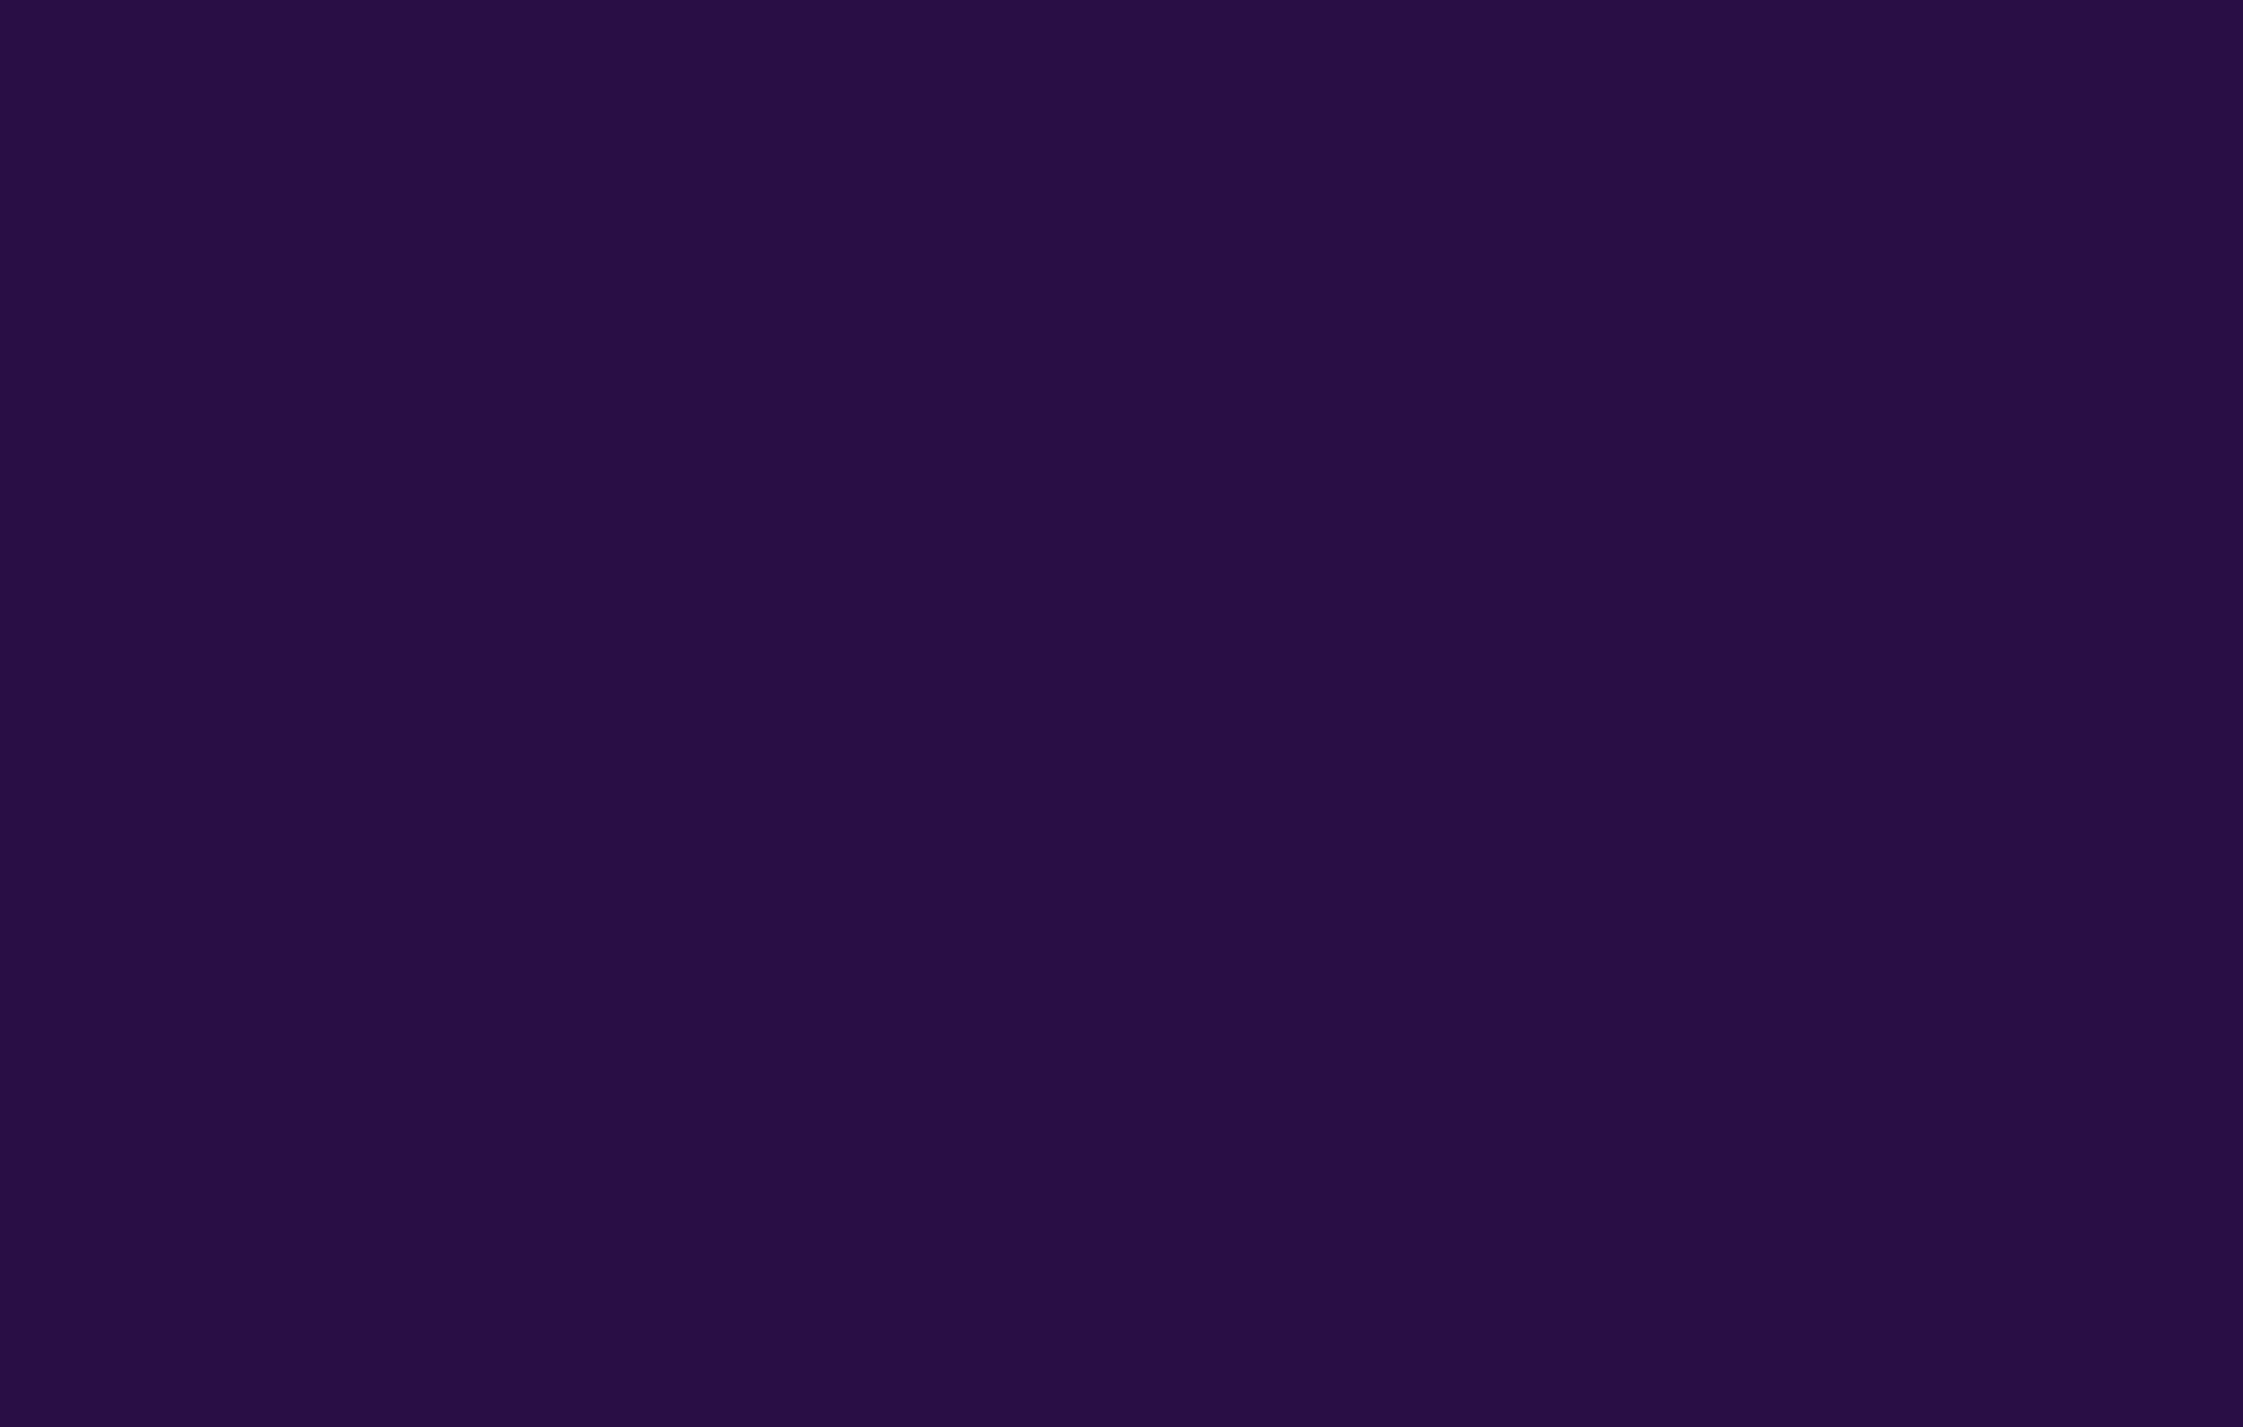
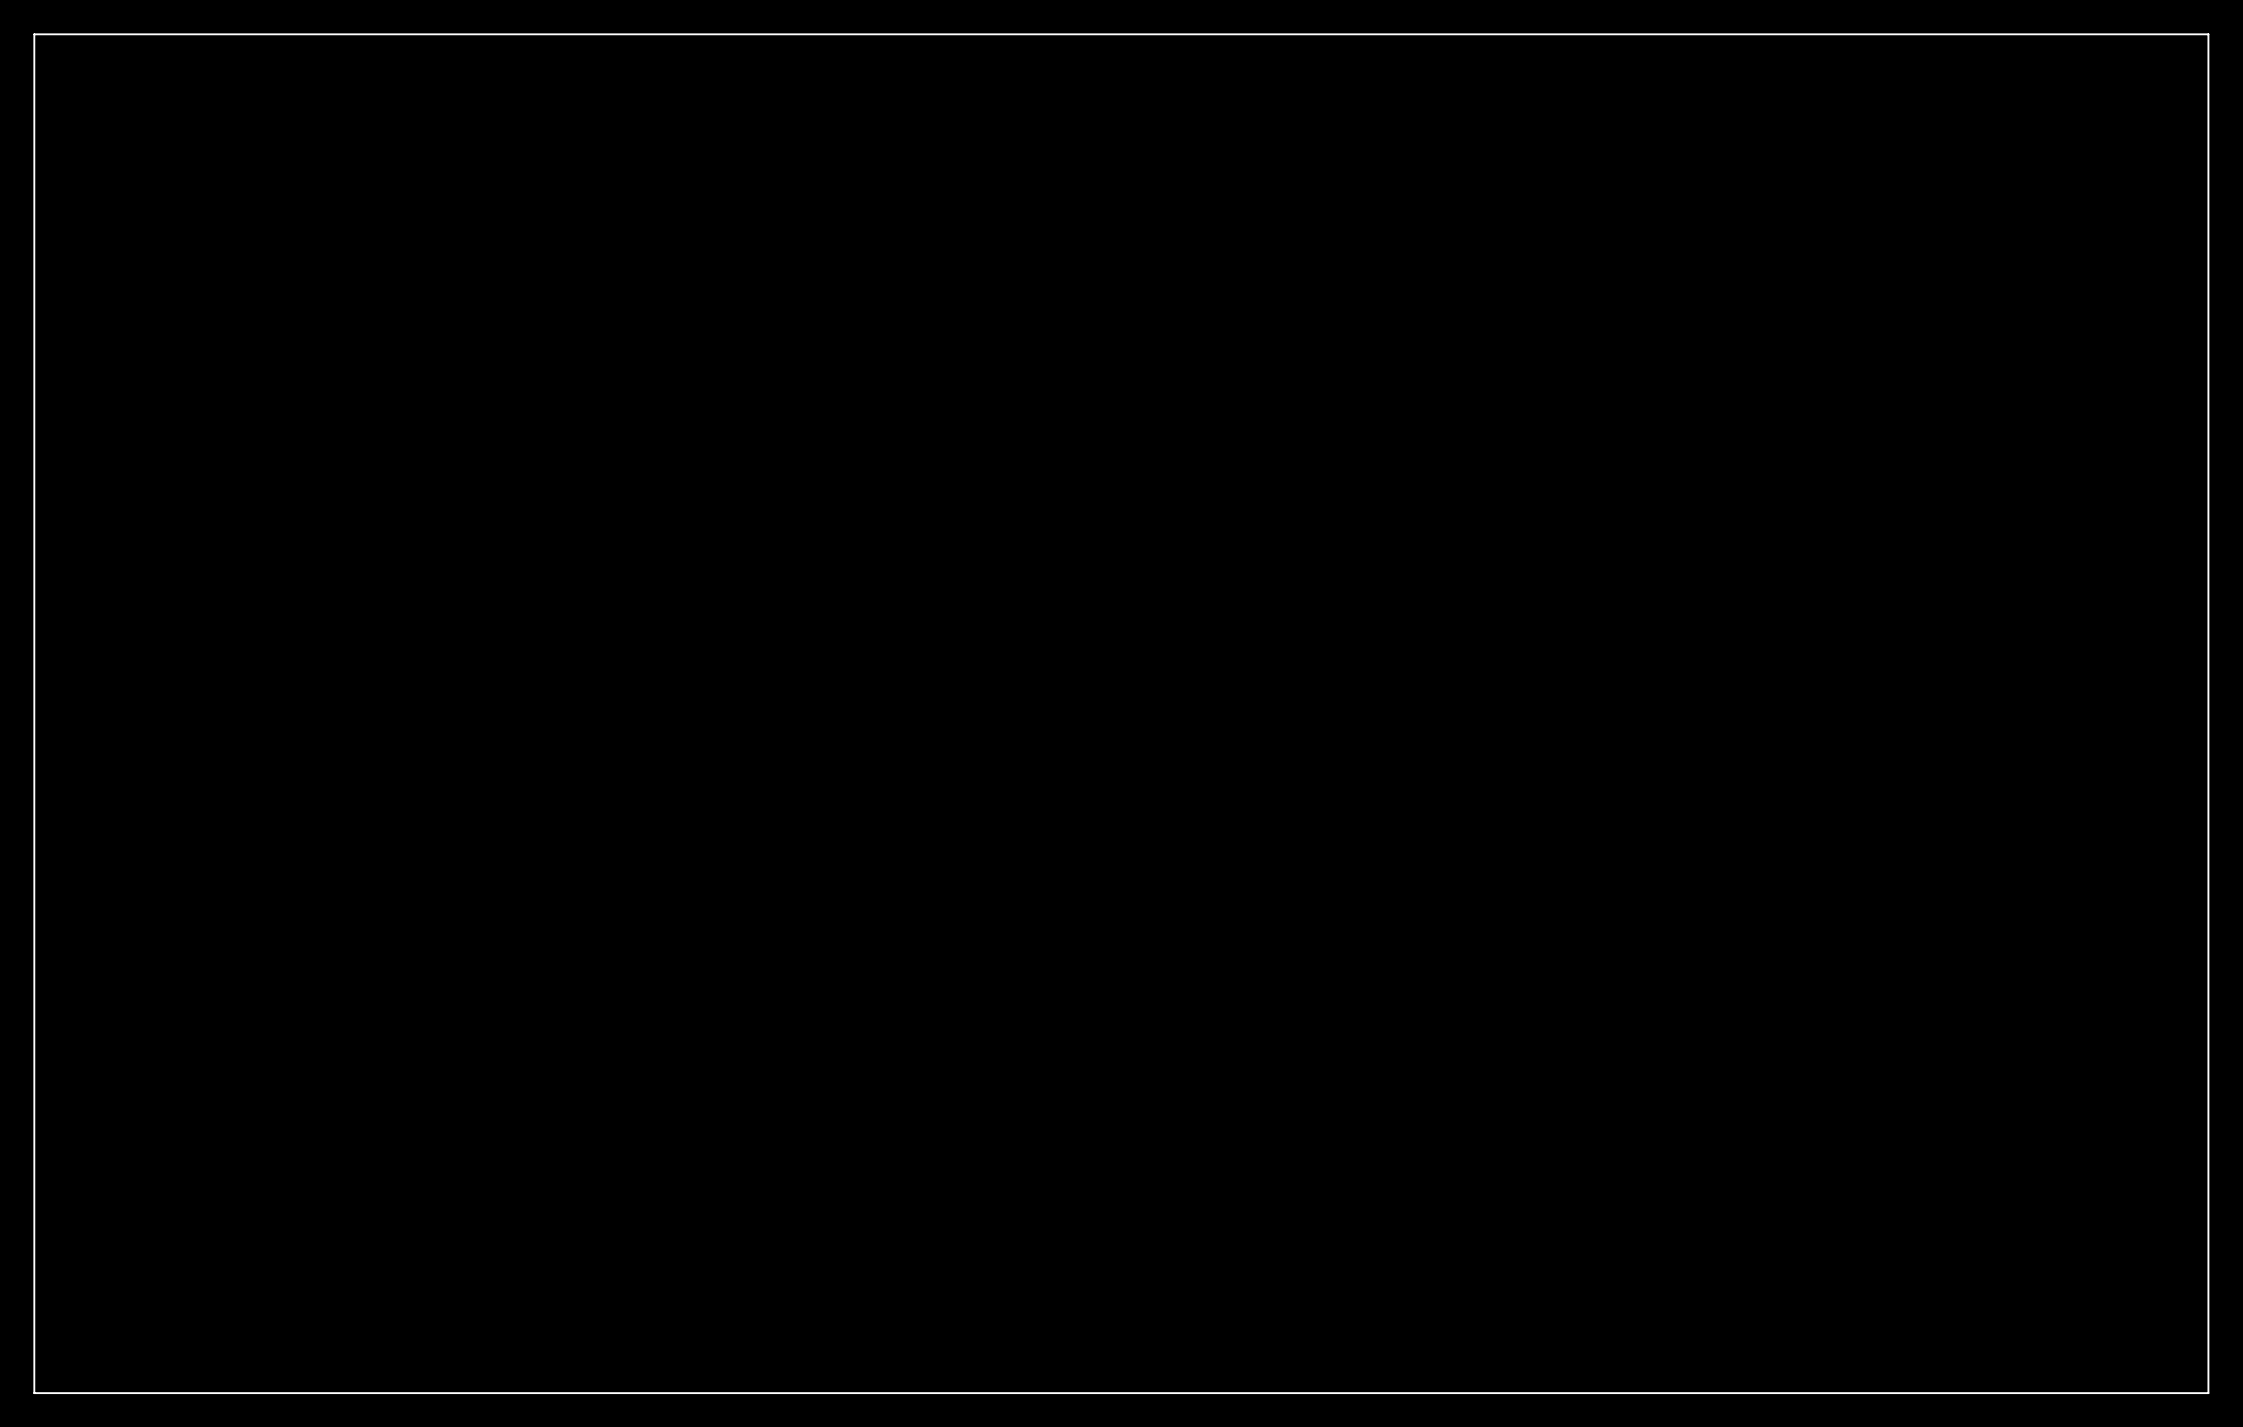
board edge: none -> (2208, 34) (34, 34) (34, 1393) (2208, 1393) (2208, 34)

